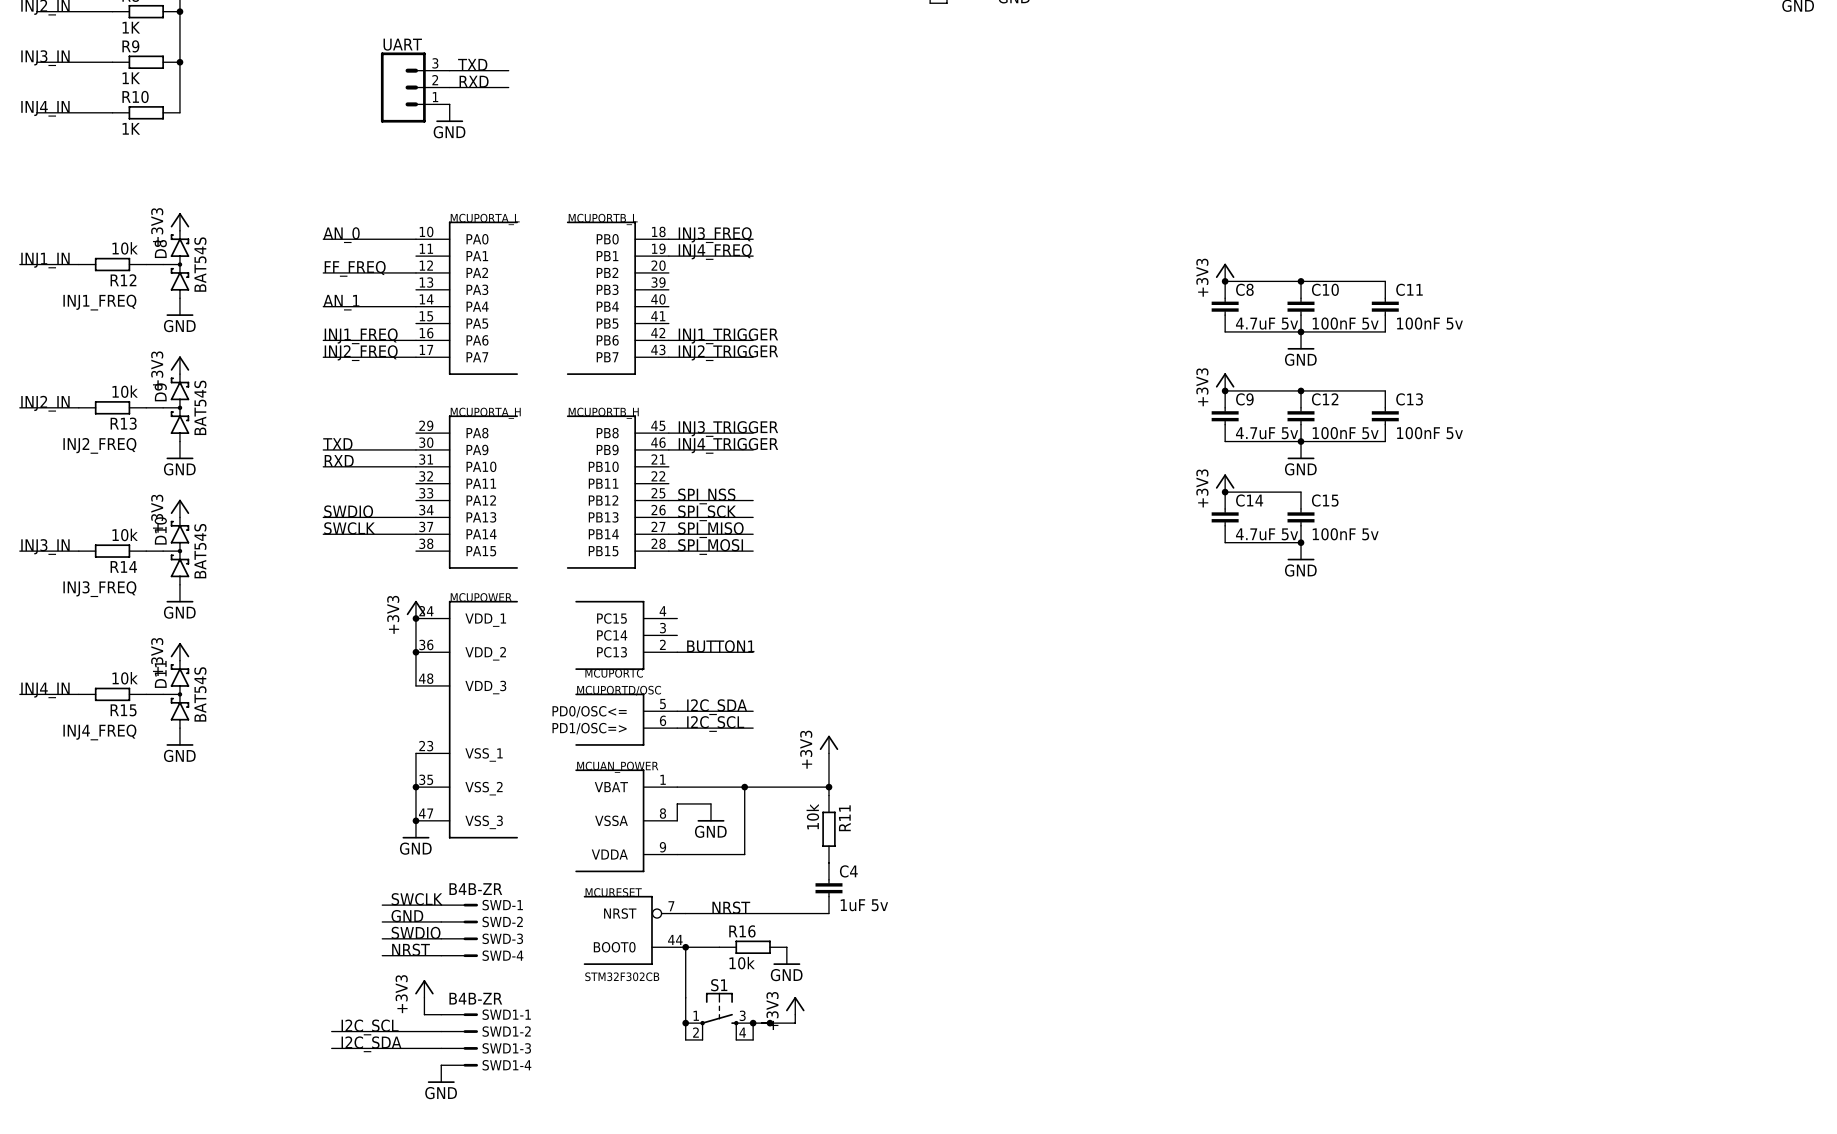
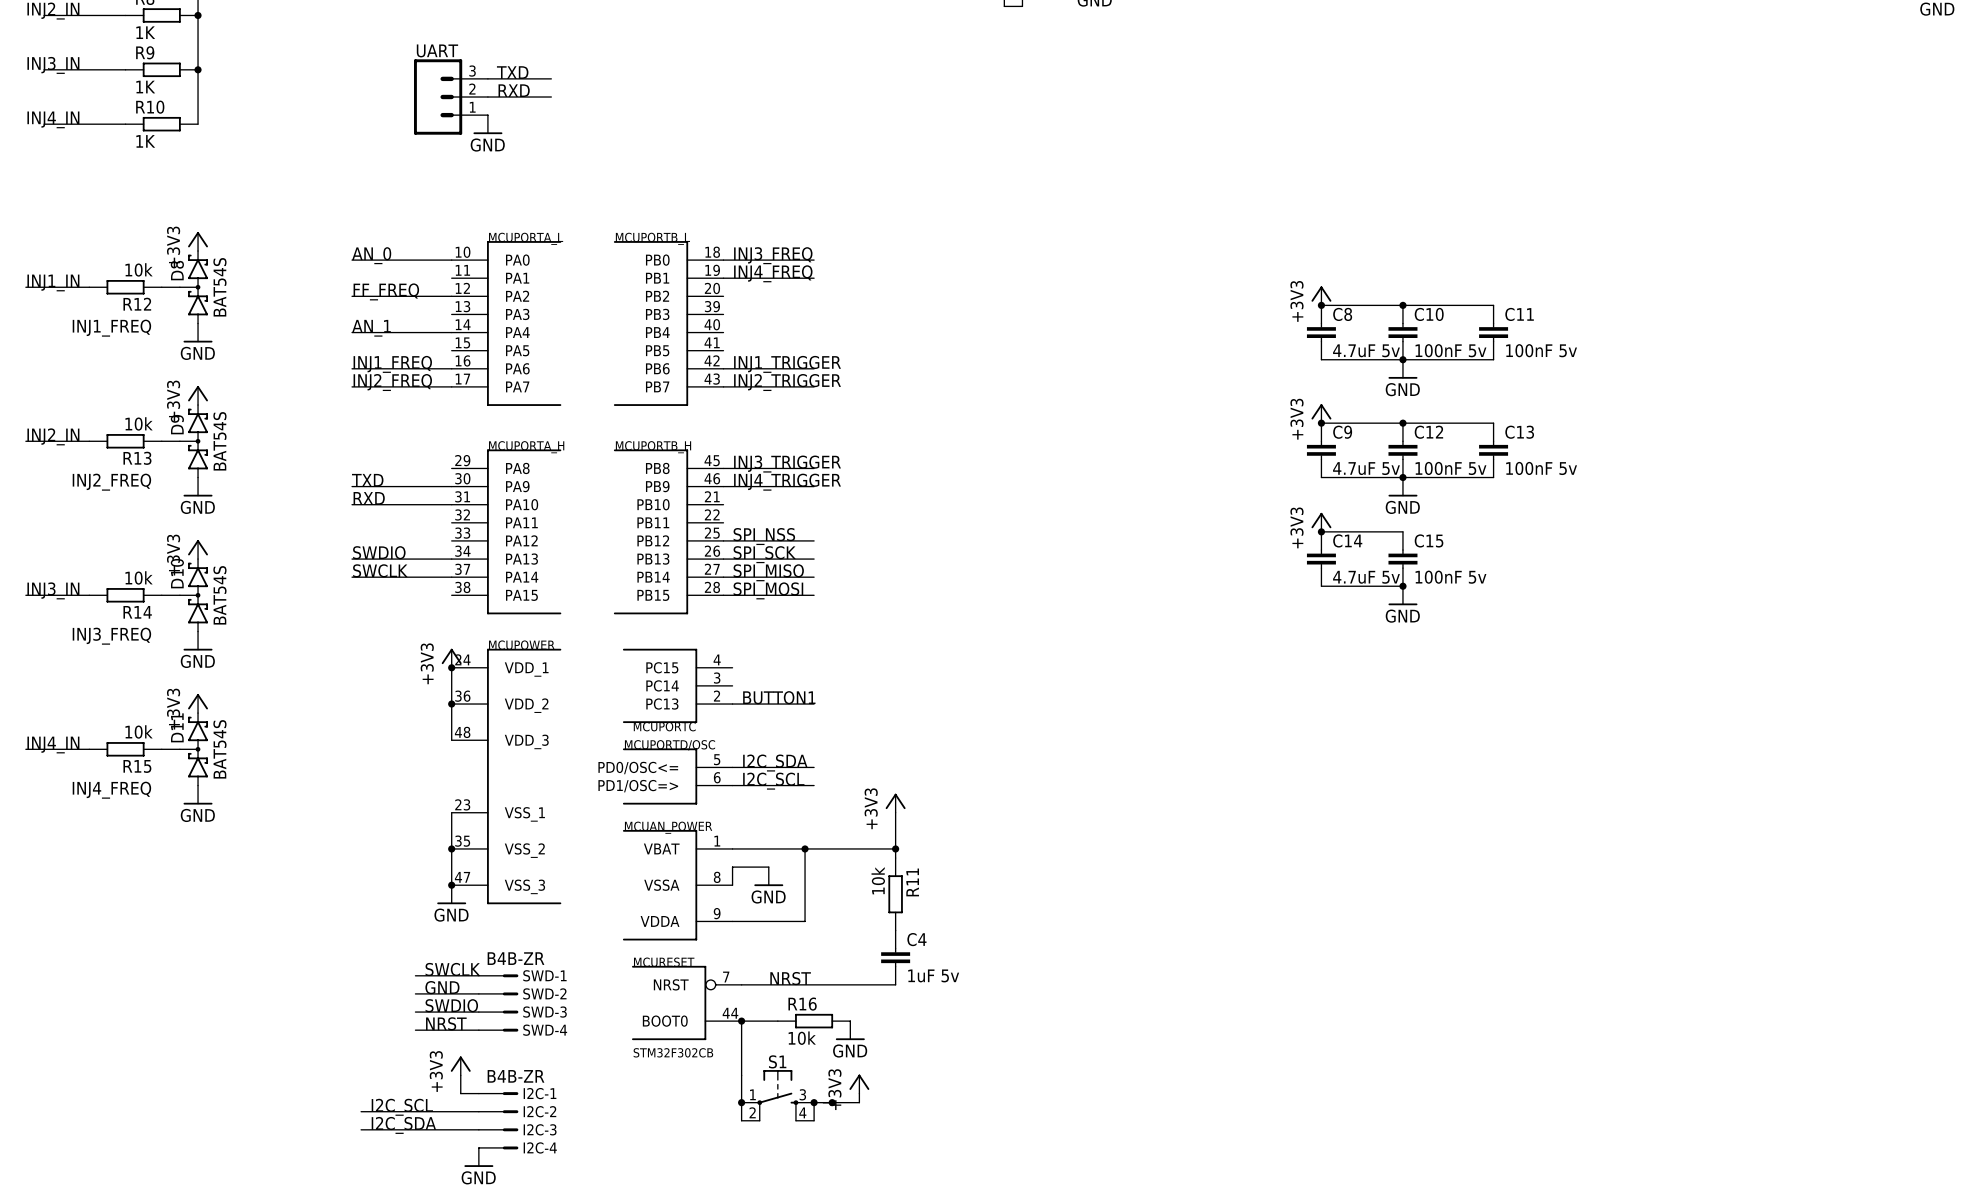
SWD1-1 name: SWD1-1 (506, 1014) -> I2C-1 (540, 1093)
SWD1-2 name: SWD1-2 (506, 1031) -> I2C-2 (539, 1111)
SWD1-3 name: SWD1-3 (506, 1048) -> I2C-3 (540, 1129)
SWD1-4 name: SWD1-4 (506, 1065) -> I2C-4 (540, 1147)

